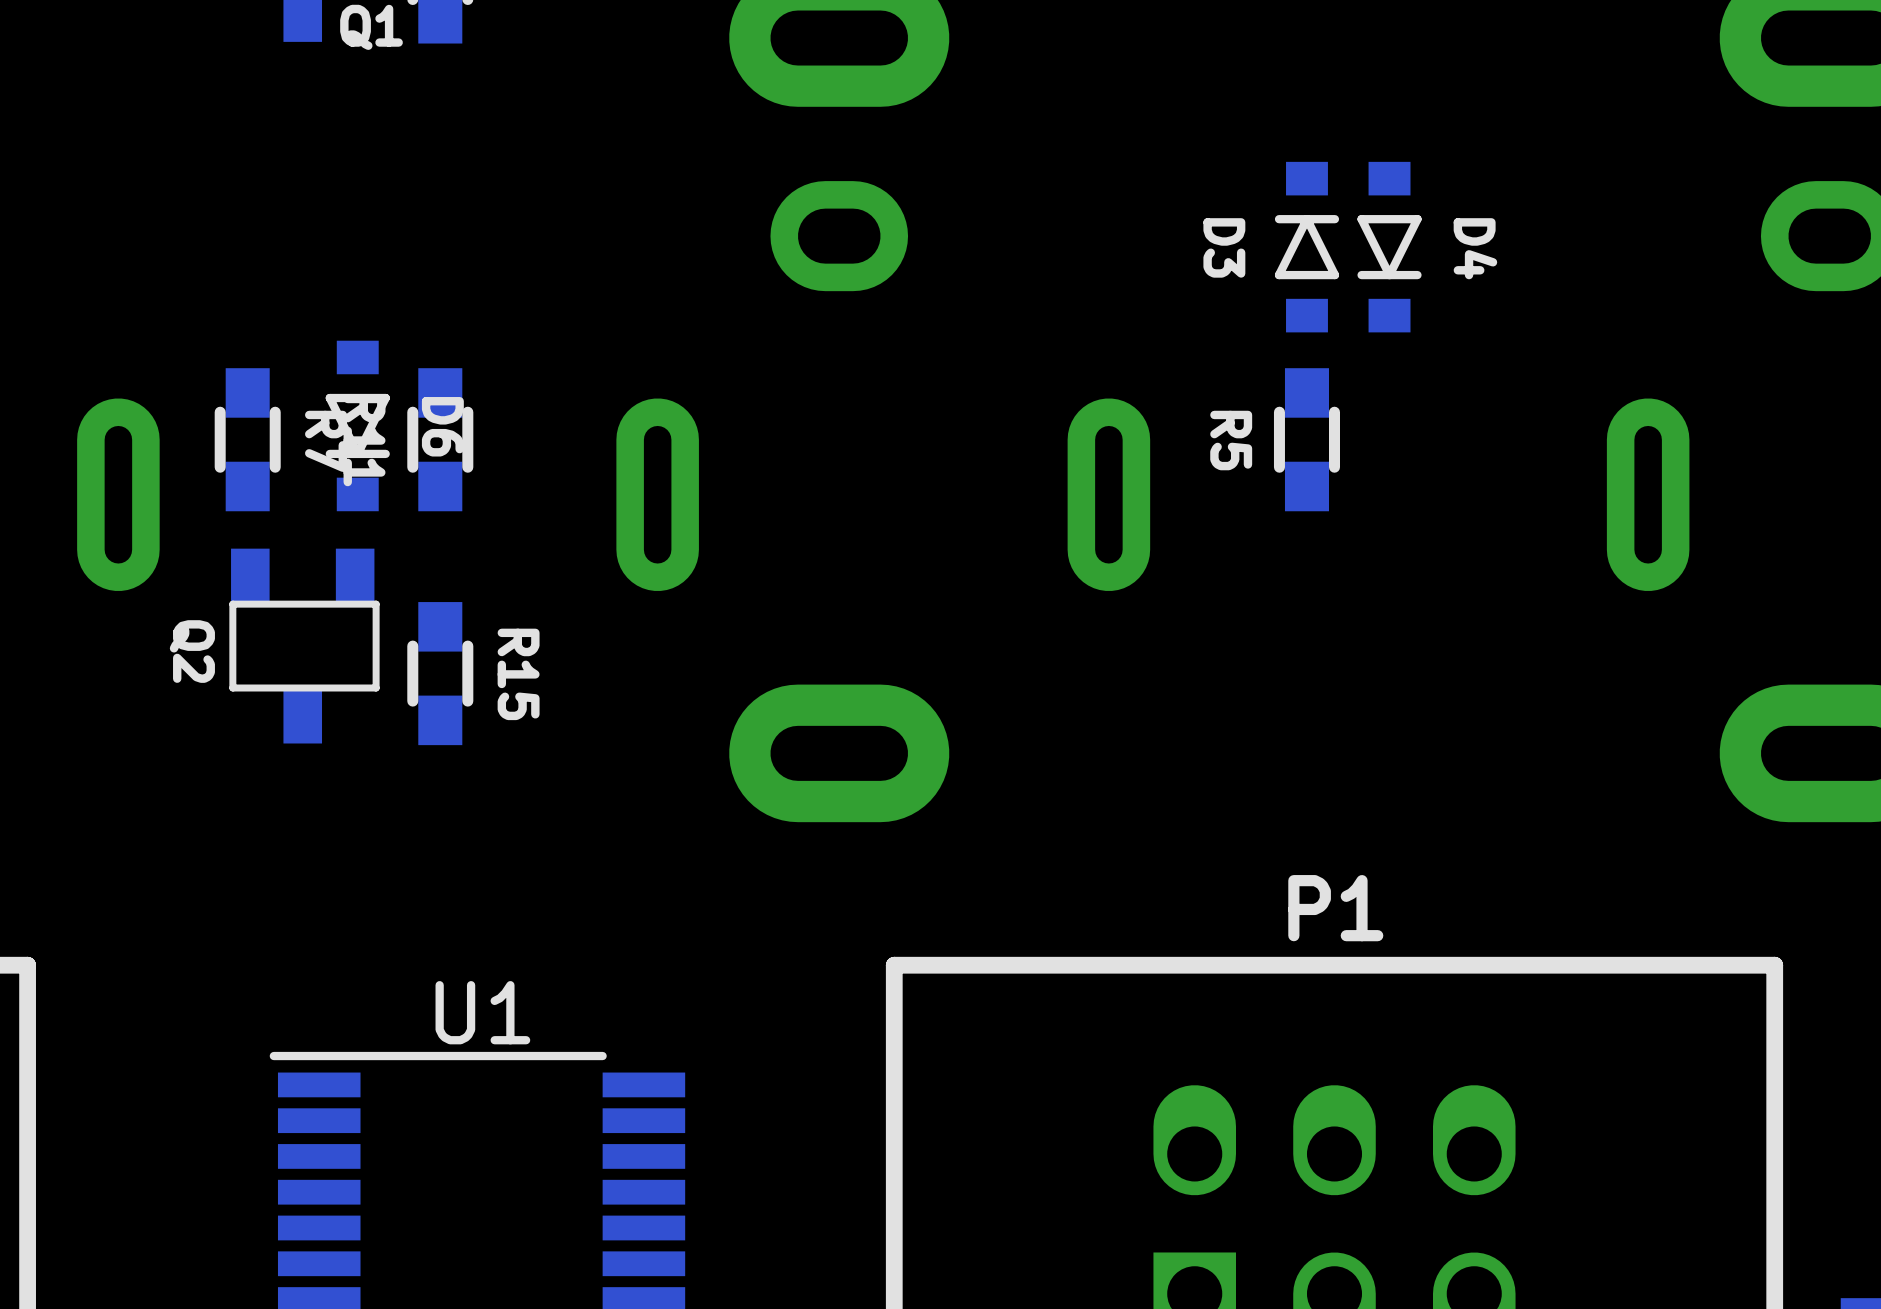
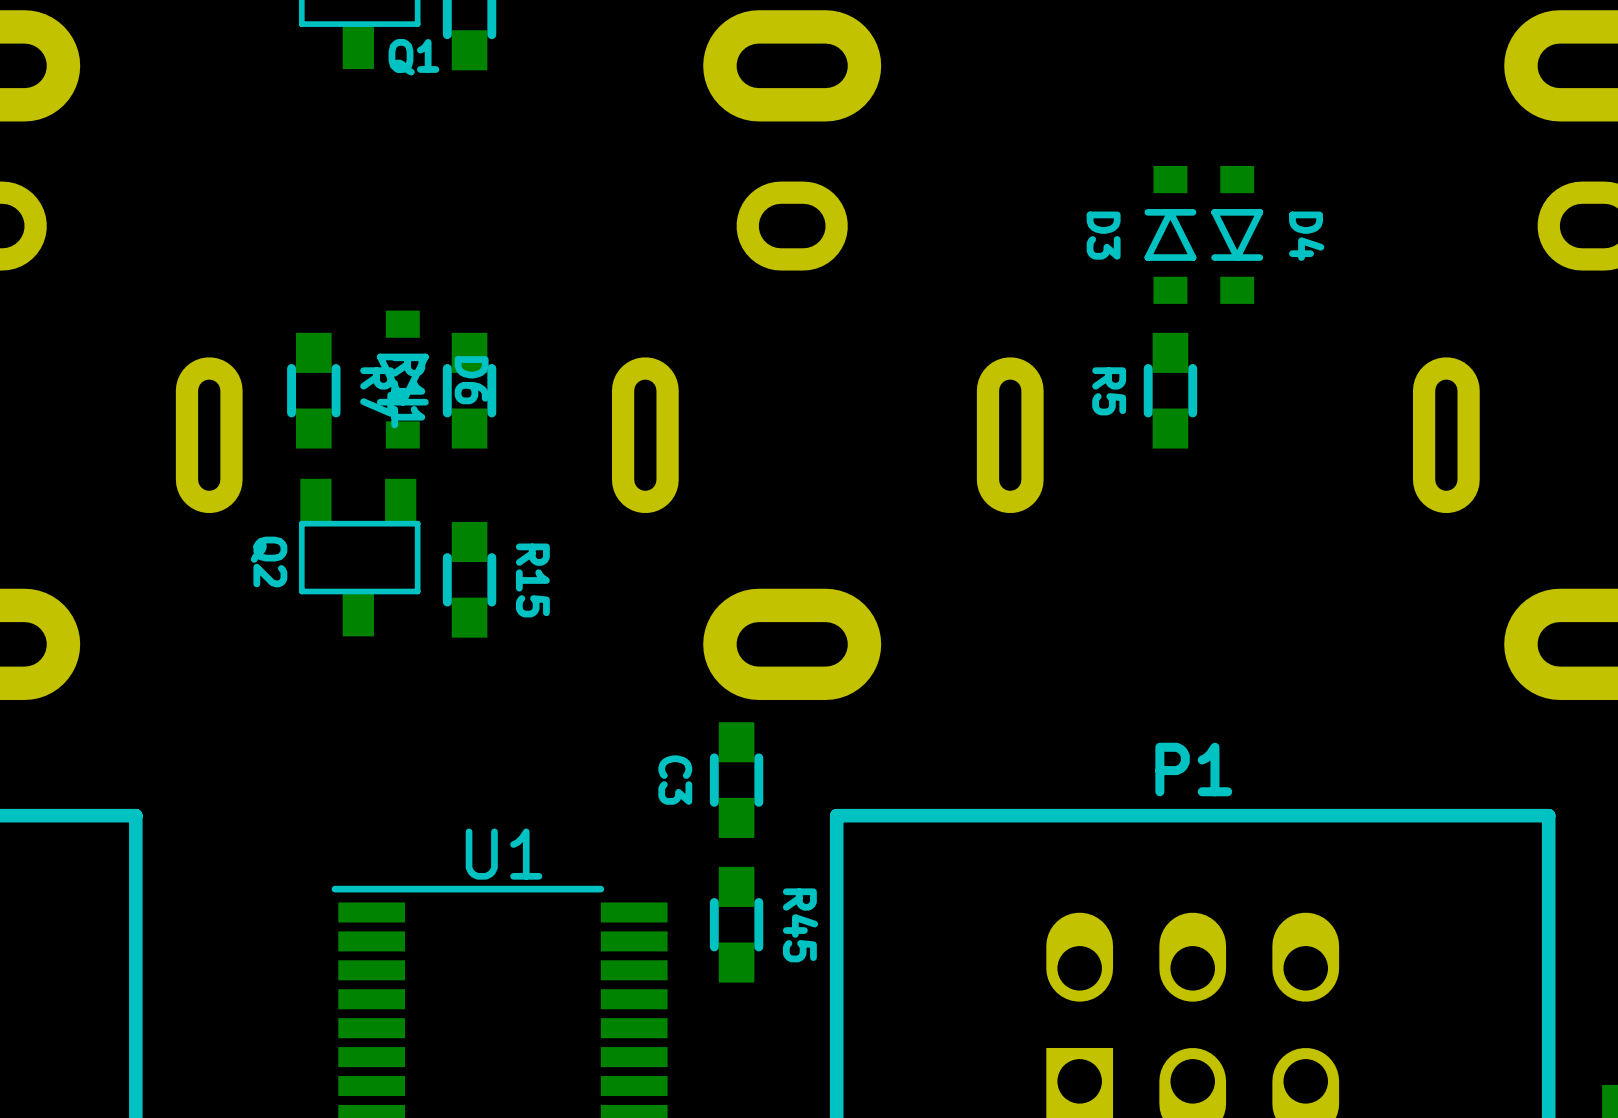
C3: none -> (736, 780)
R45: none -> (736, 924)

